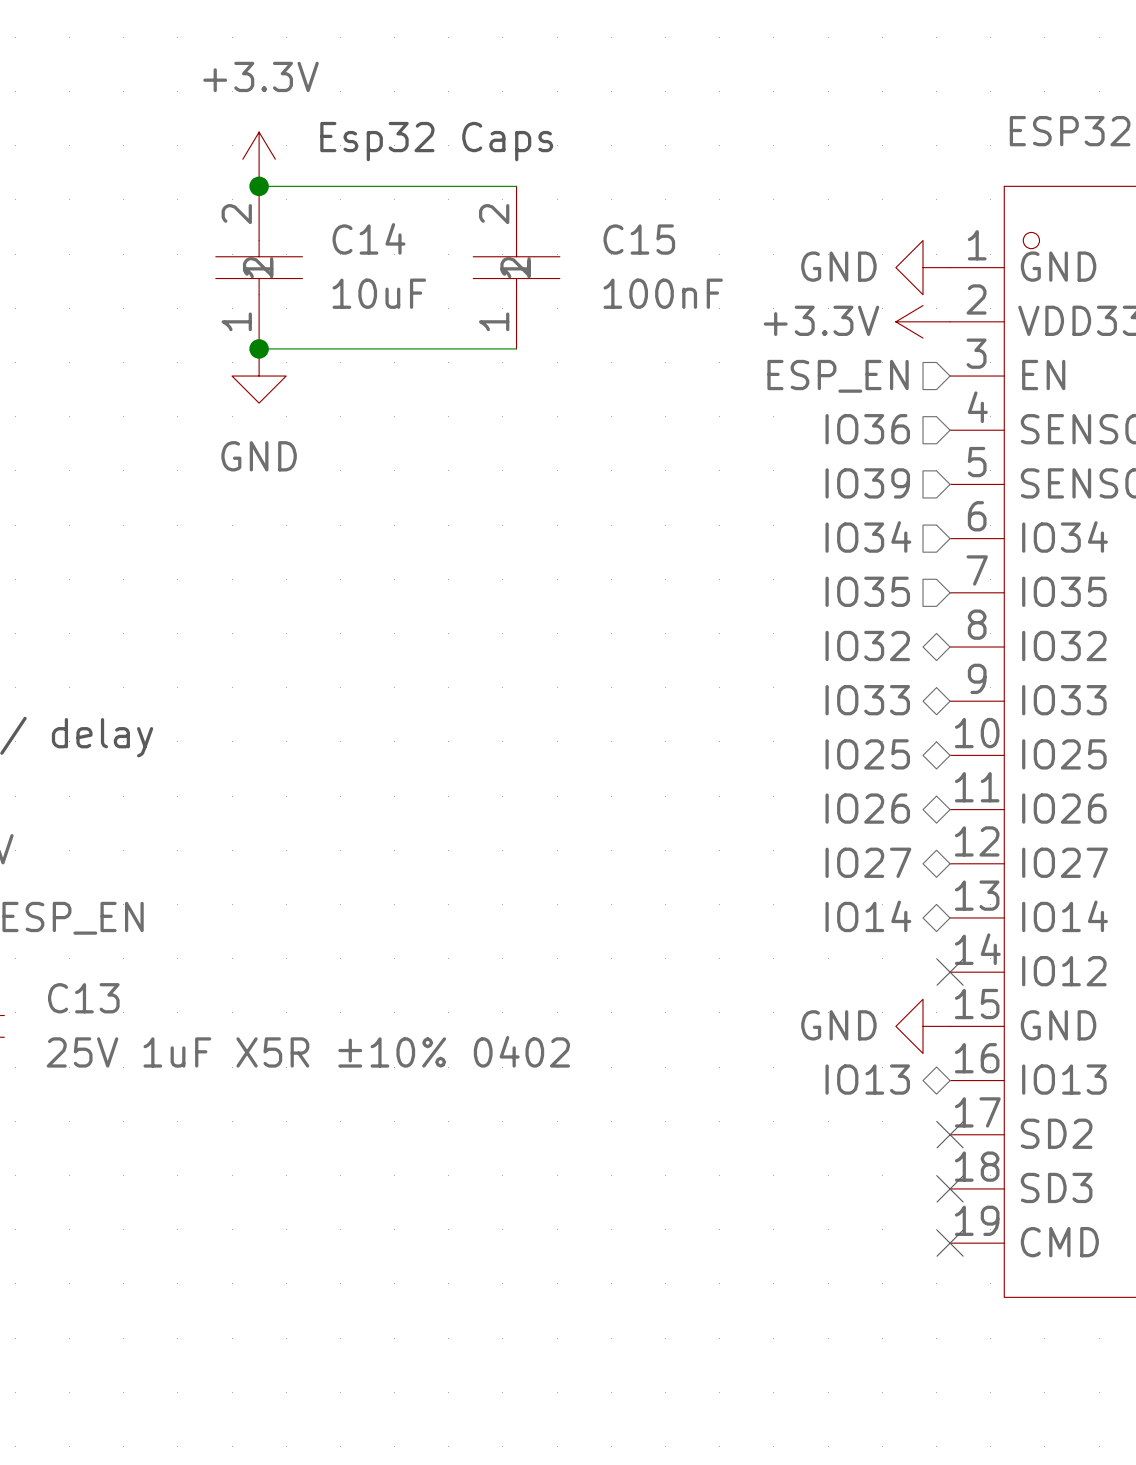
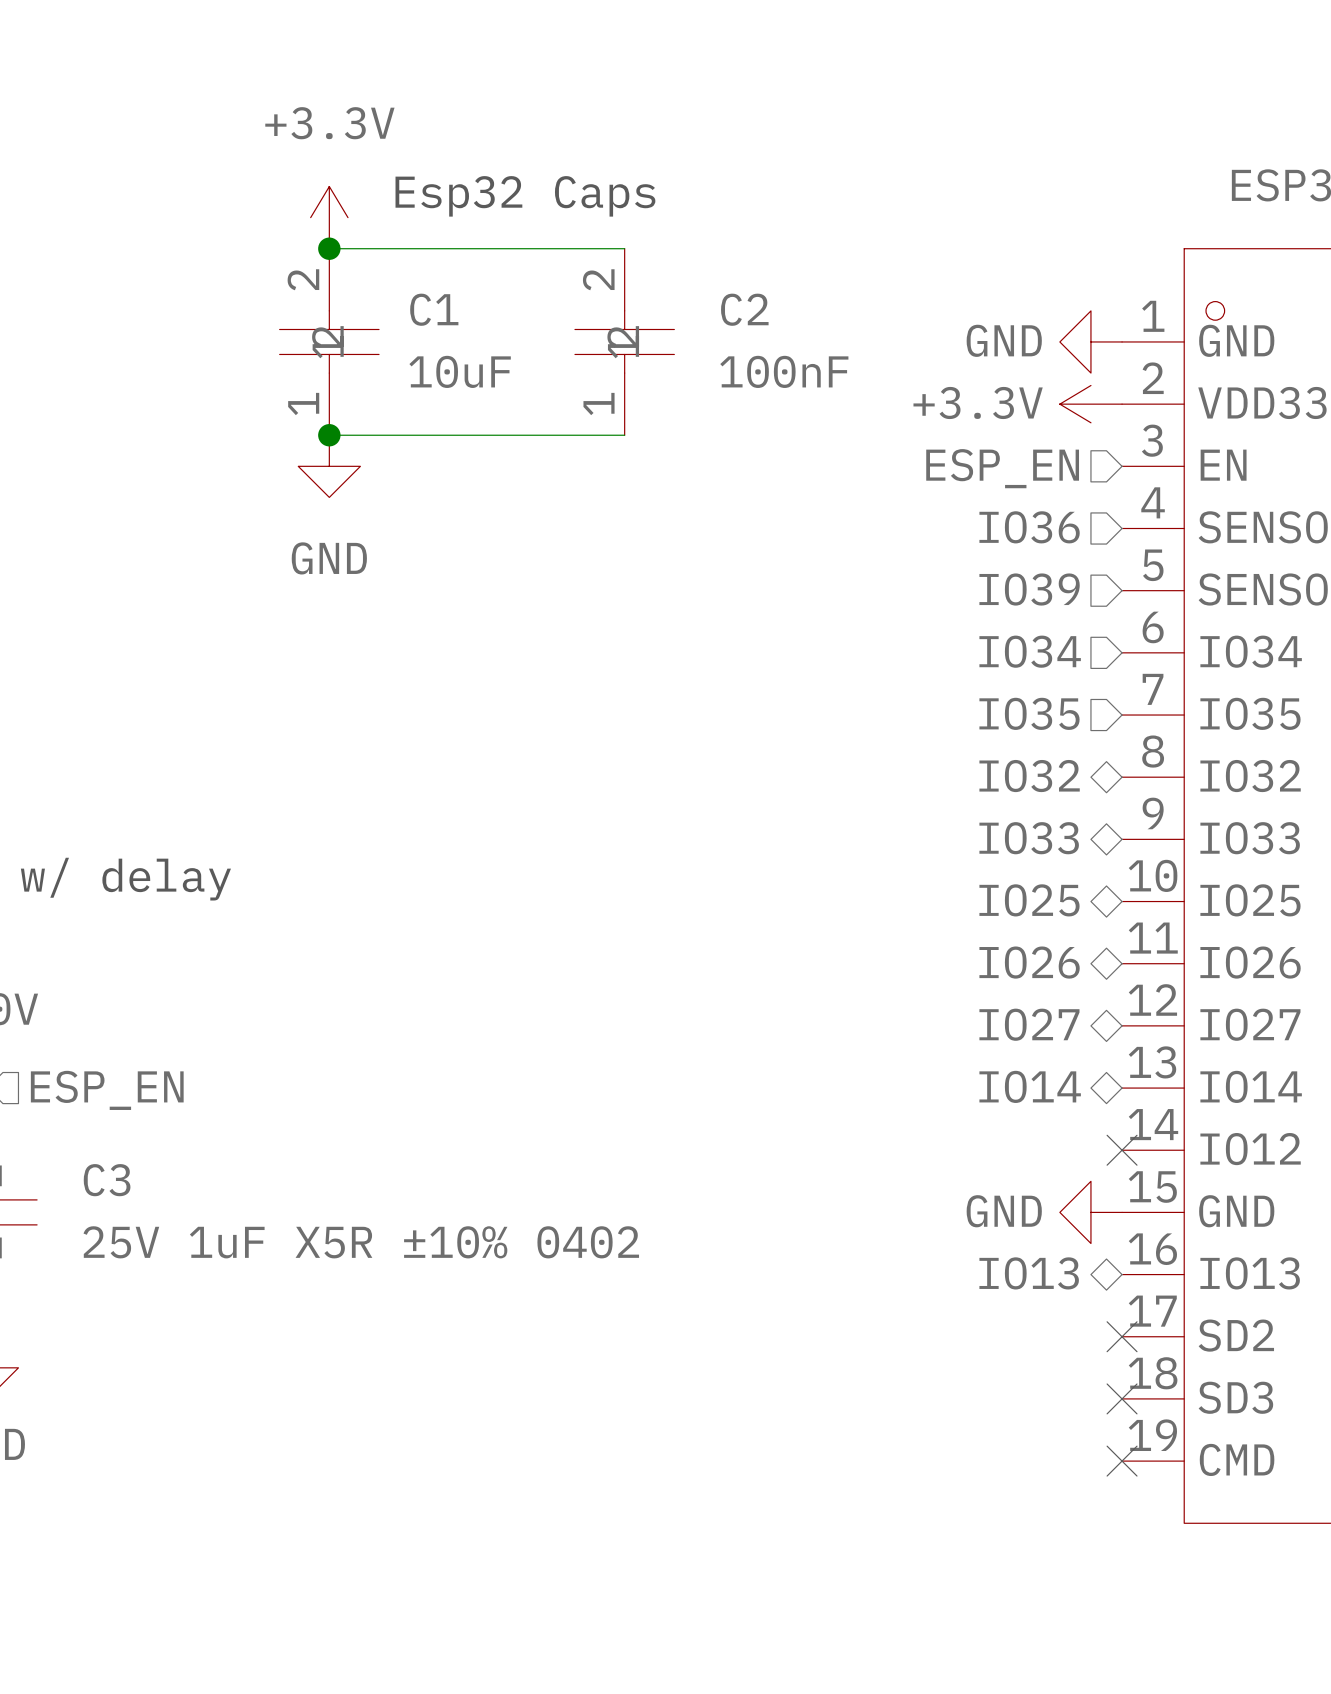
C14 name: C14 (368, 238) -> C1 (434, 309)
C15 name: C15 (639, 239) -> C2 (744, 309)
C13 name: C13 (83, 998) -> C3 (107, 1180)

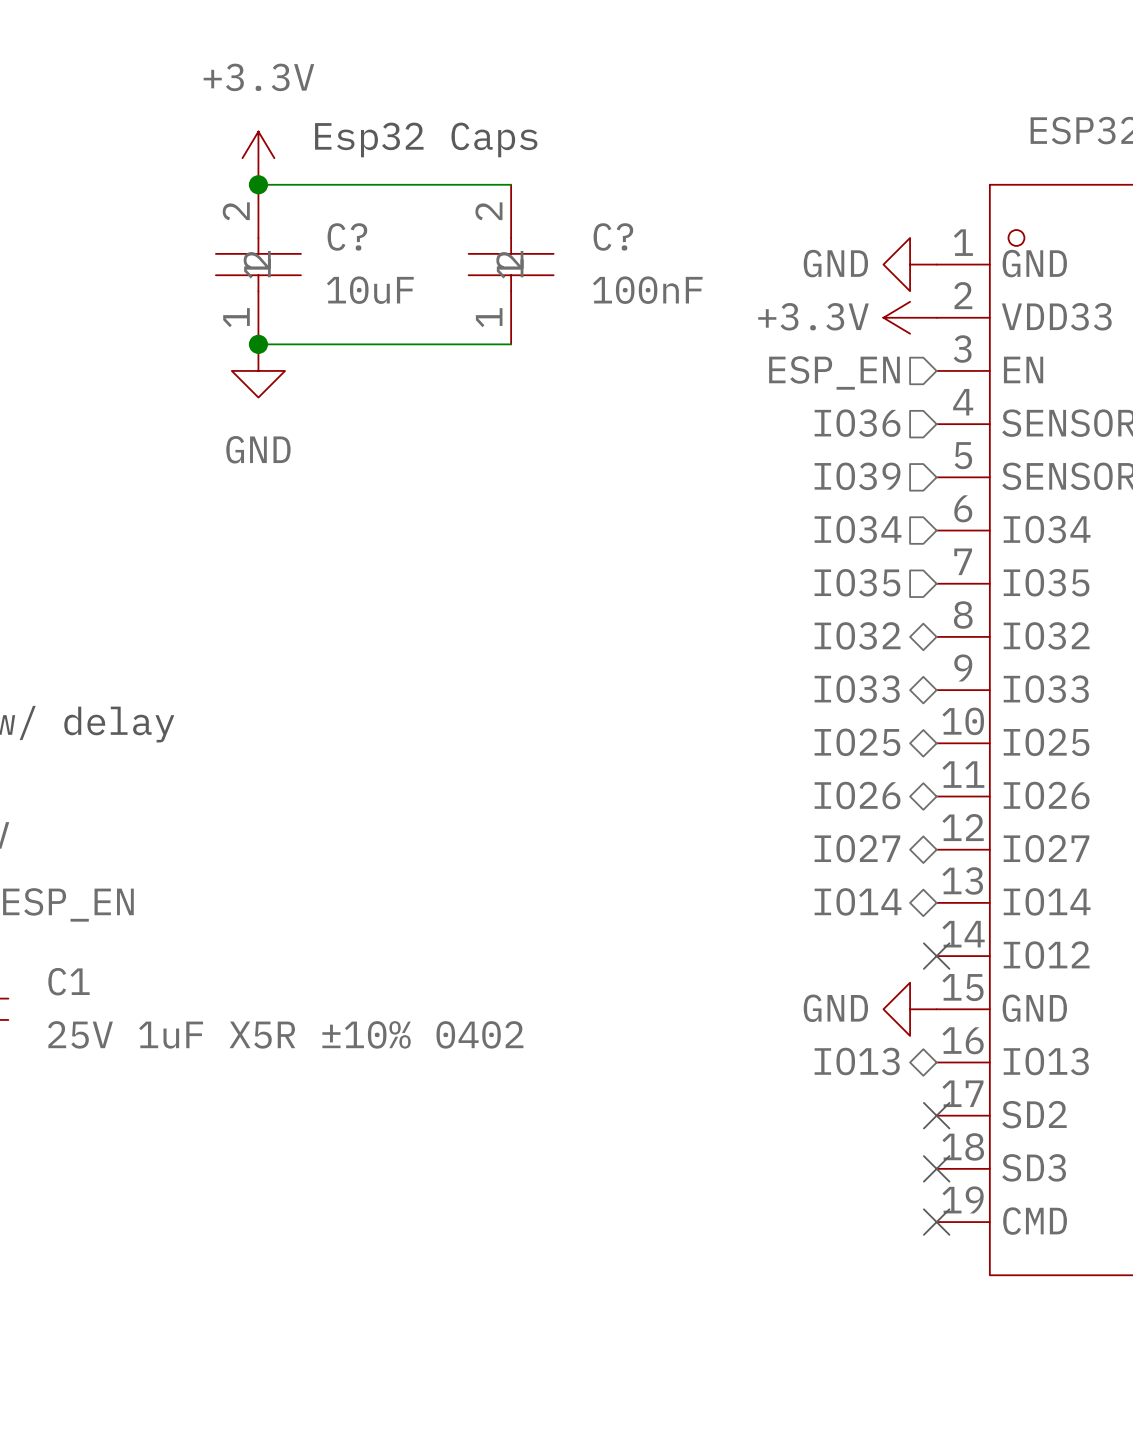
C1 name: C1 (434, 309) -> C? (347, 236)
C2 name: C2 (744, 309) -> C? (613, 236)
C3 name: C3 (107, 1180) -> C1 (68, 981)

